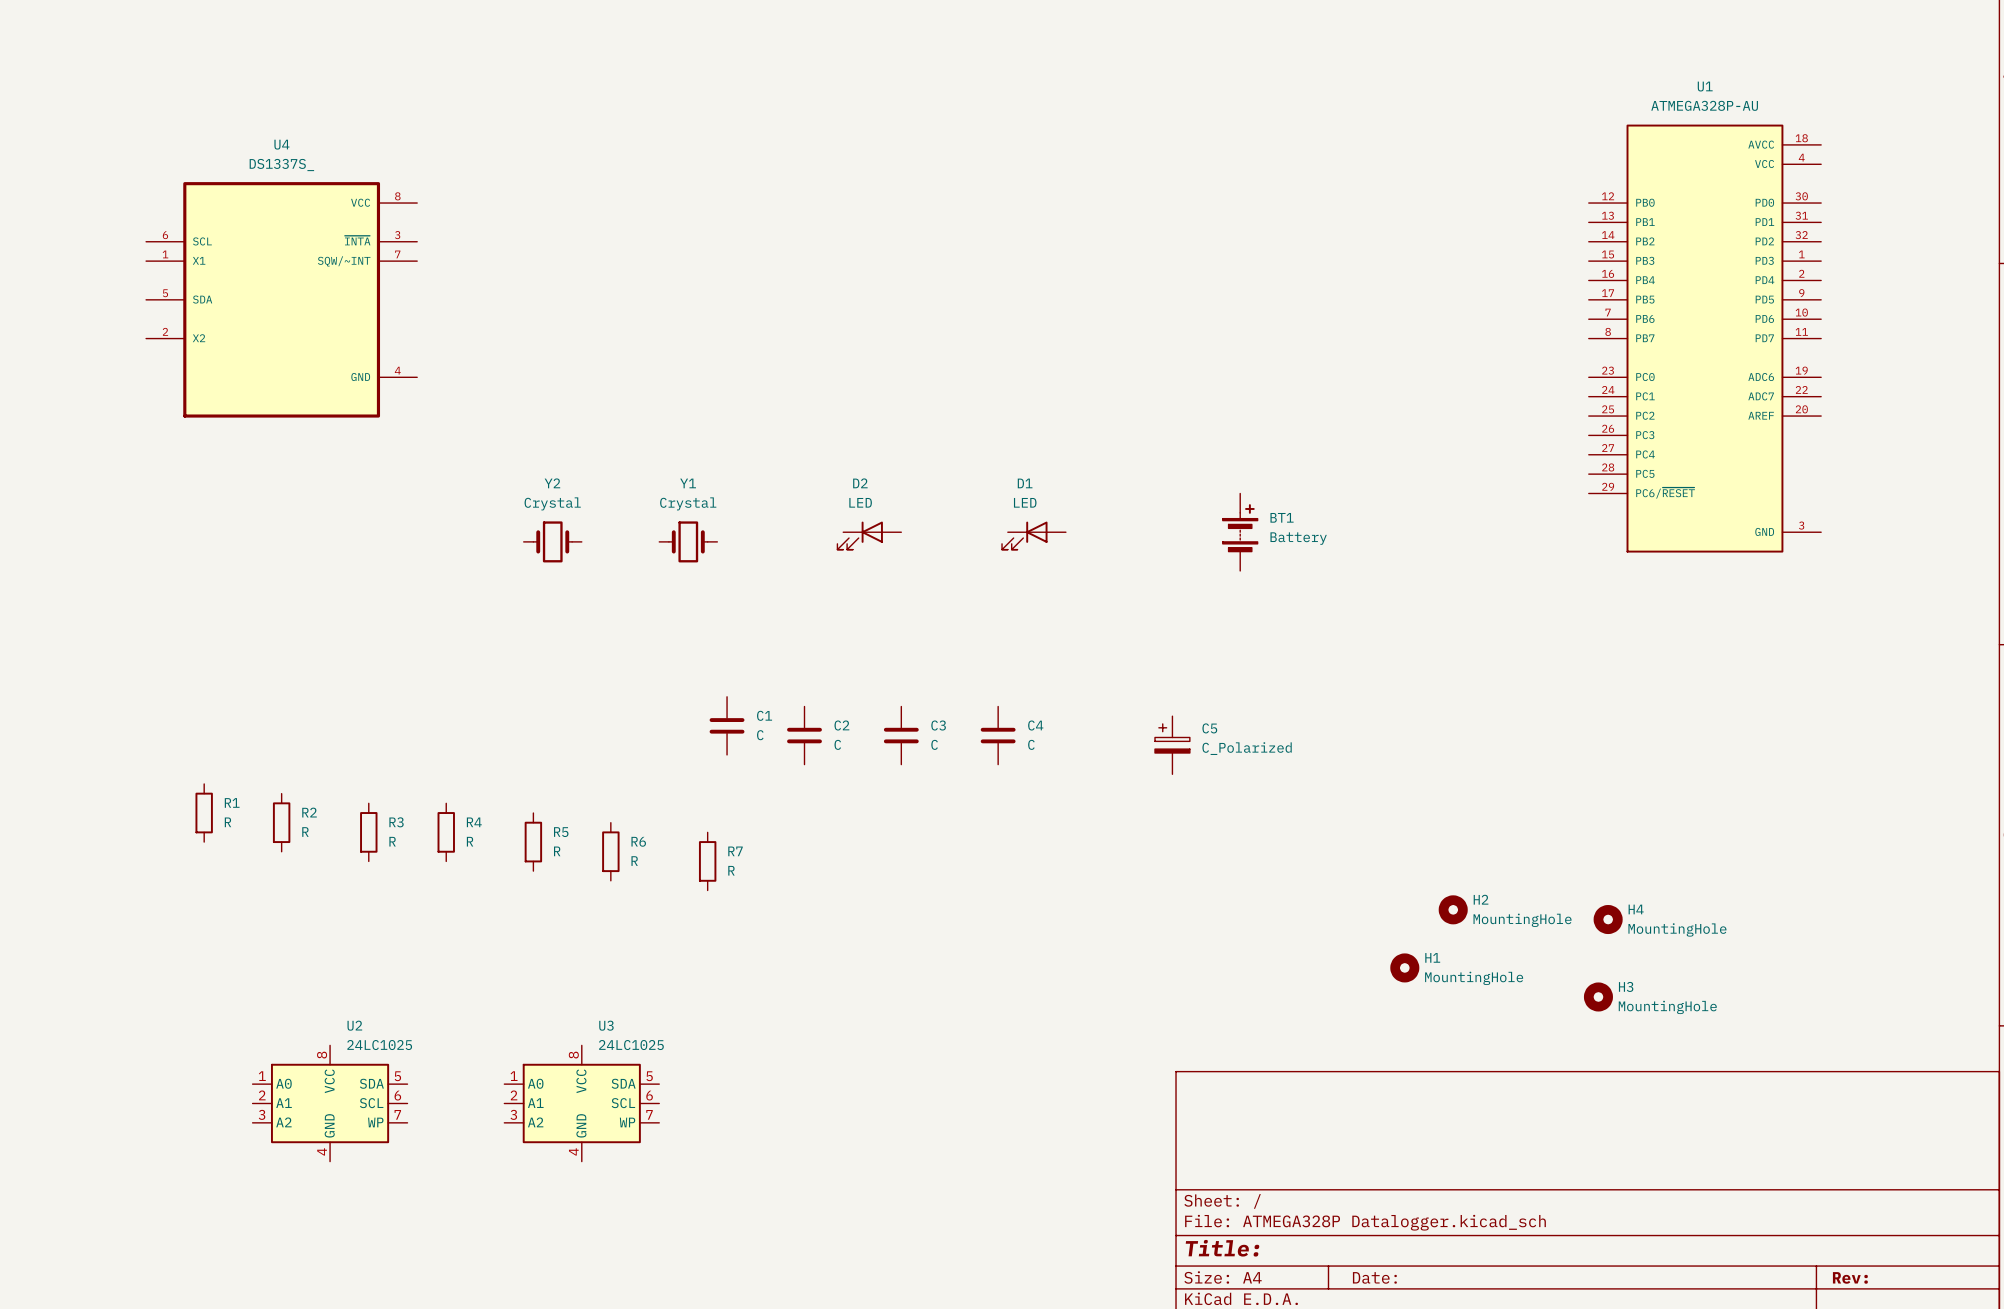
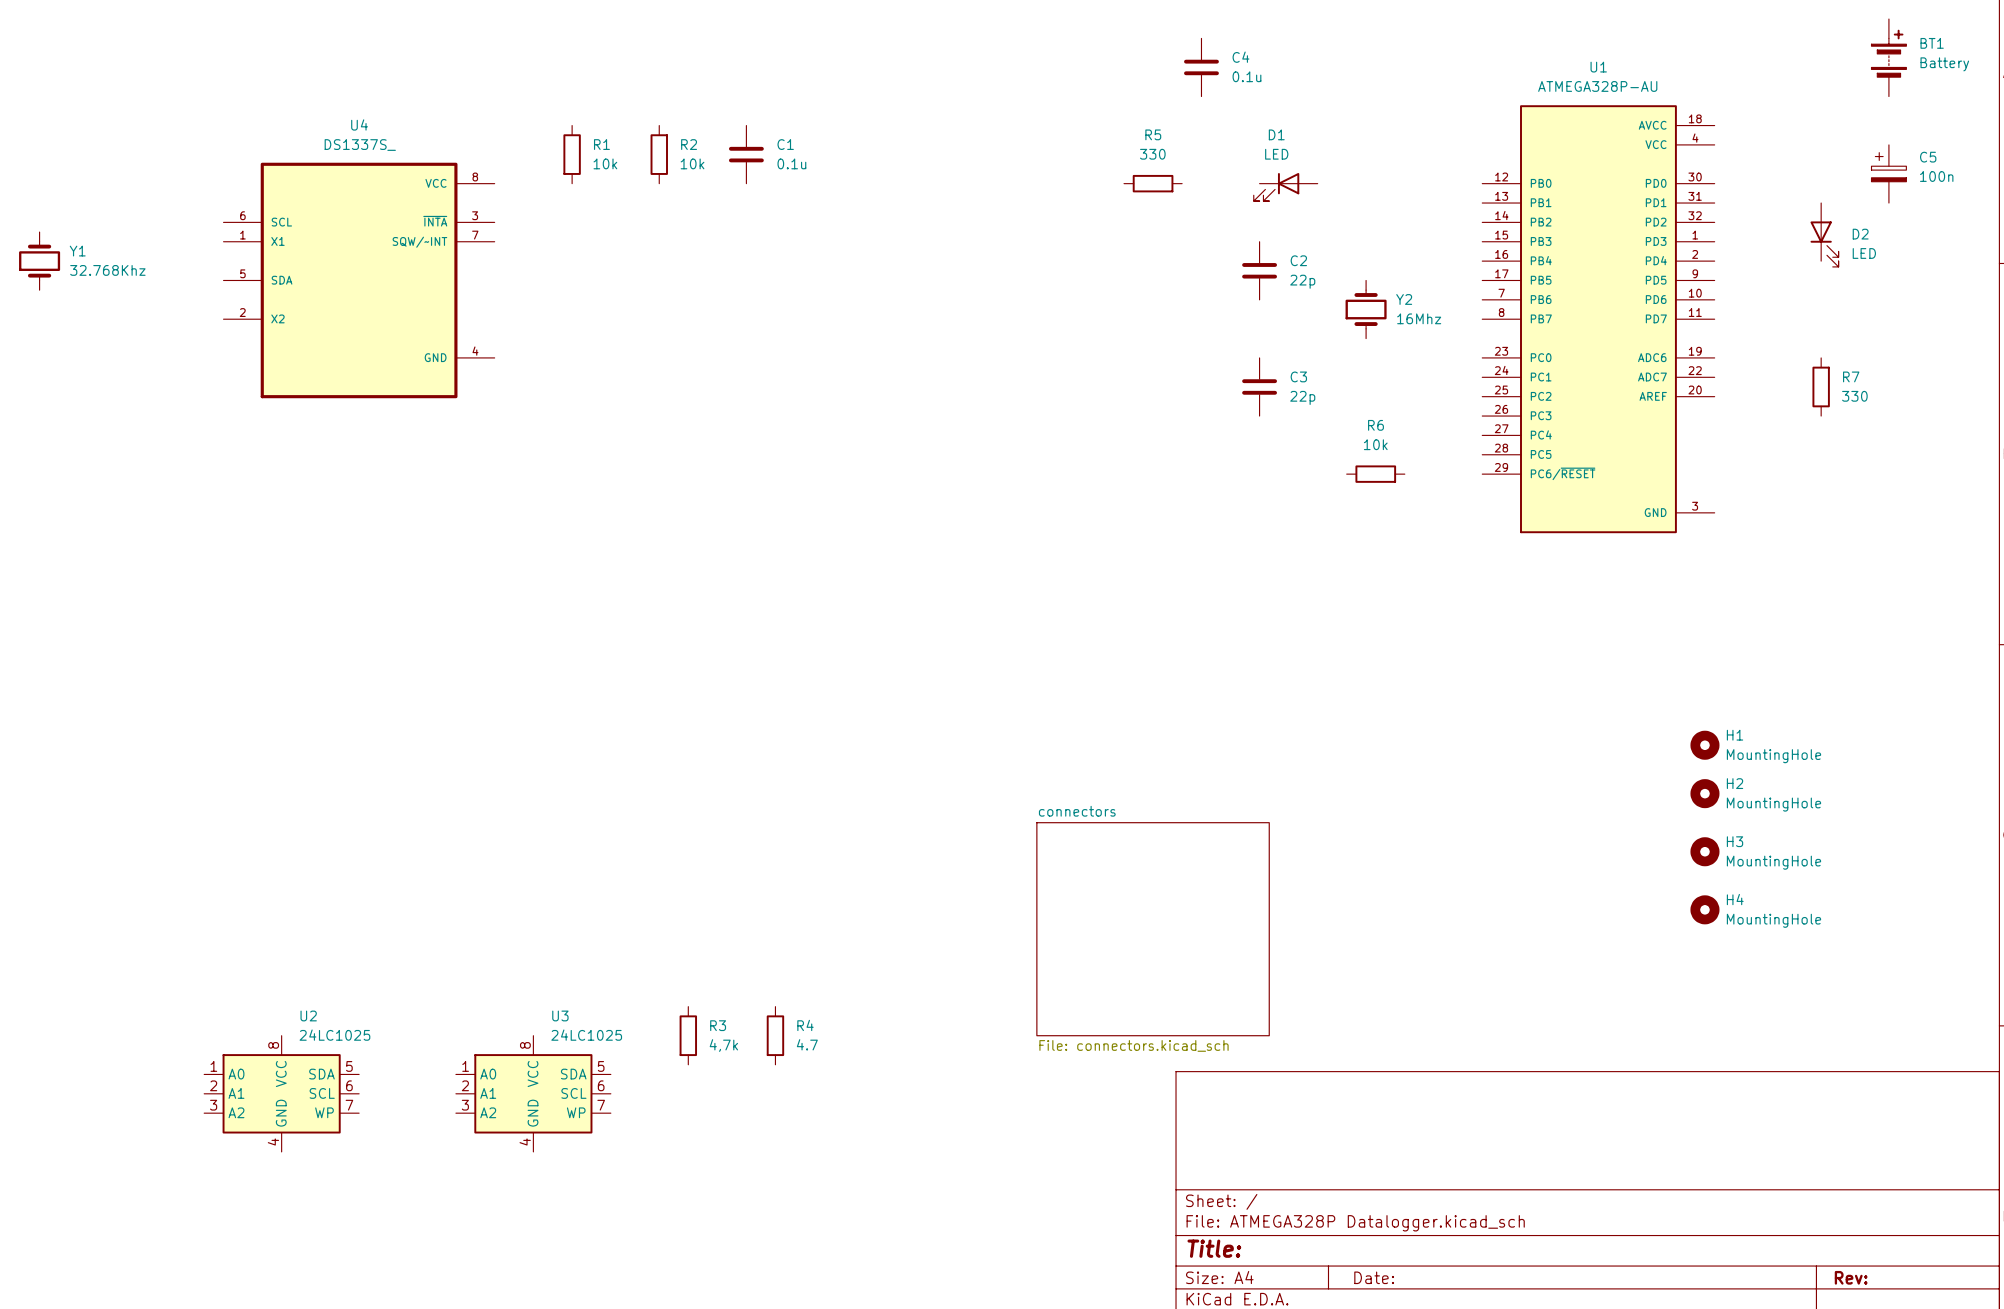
U4 position: (281, 299) -> (359, 280)
U1 position: (1704, 338) -> (1598, 319)
Y2 name position: Y2 (552, 483) -> Y2 (1404, 299)
Y1 name position: Y1 (688, 483) -> Y1 (77, 251)
D2 name position: D2 (860, 483) -> D2 (1860, 234)
D2 value position: LED (860, 502) -> LED (1864, 253)
Y2 value: Crystal (552, 503) -> 16Mhz (1419, 318)
Y1 value: Crystal (688, 503) -> 32.768Khz (107, 270)
BT1 position: (1240, 532) -> (1888, 57)
D2 rotation: 0° (860, 535) -> 90° counterclockwise (1824, 244)
D2 position: (869, 535) -> (1824, 234)
D1 position: (1033, 535) -> (1285, 187)
Y2 rotation: 0° (552, 541) -> 90° clockwise (1366, 309)
Y2 position: (552, 541) -> (1366, 309)
Y1 rotation: 0° (688, 541) -> 90° clockwise (39, 261)
Y1 position: (688, 541) -> (39, 261)
C1 position: (727, 725) -> (746, 154)
C1 value: C (760, 735) -> 0.1u (791, 163)
C2 position: (804, 735) -> (1259, 270)
C3 position: (901, 735) -> (1259, 386)
C4 position: (998, 735) -> (1201, 67)
C2 value: C (837, 744) -> 22p (1302, 281)
C3 value: C (934, 744) -> 22p (1302, 397)
C4 value: C (1031, 744) -> 0.1u (1246, 76)
C5 position: (1172, 745) -> (1888, 173)
C5 value: C_Polarized (1247, 748) -> 100n (1936, 176)
R1 position: (204, 813) -> (572, 154)
R1 value: R (227, 822) -> 10k (605, 163)
R2 position: (281, 822) -> (659, 154)
R2 value: R (305, 832) -> 10k (692, 163)
R3 position: (368, 832) -> (688, 1035)
R4 position: (446, 832) -> (775, 1035)
R5 name position: R5 (561, 832) -> R5 (1153, 134)
R3 value: R (392, 841) -> 4,7k (723, 1045)
R4 value: R (470, 841) -> 4.7 (807, 1044)
R6 name position: R6 (638, 841) -> R6 (1375, 425)
R5 rotation: 0° (533, 842) -> 90° clockwise (1153, 183)
R5 position: (533, 842) -> (1153, 183)
R5 value: R (557, 851) -> 330 (1152, 154)
R6 rotation: 0° (610, 851) -> 90° clockwise (1375, 474)
R6 position: (610, 851) -> (1375, 474)
R6 value: R (634, 861) -> 10k (1375, 444)
R7 position: (707, 861) -> (1821, 386)
R7 value: R (731, 870) -> 330 (1854, 396)
H2 position: (1453, 909) -> (1704, 793)
H4 position: (1608, 919) -> (1704, 909)
sheet connectors: none -> File: connectors.kicad_sch (1153, 929)
H1 position: (1404, 967) -> (1704, 745)
H3 position: (1598, 996) -> (1704, 851)
U2 position: (330, 1103) -> (281, 1093)
U3 position: (581, 1103) -> (533, 1093)

